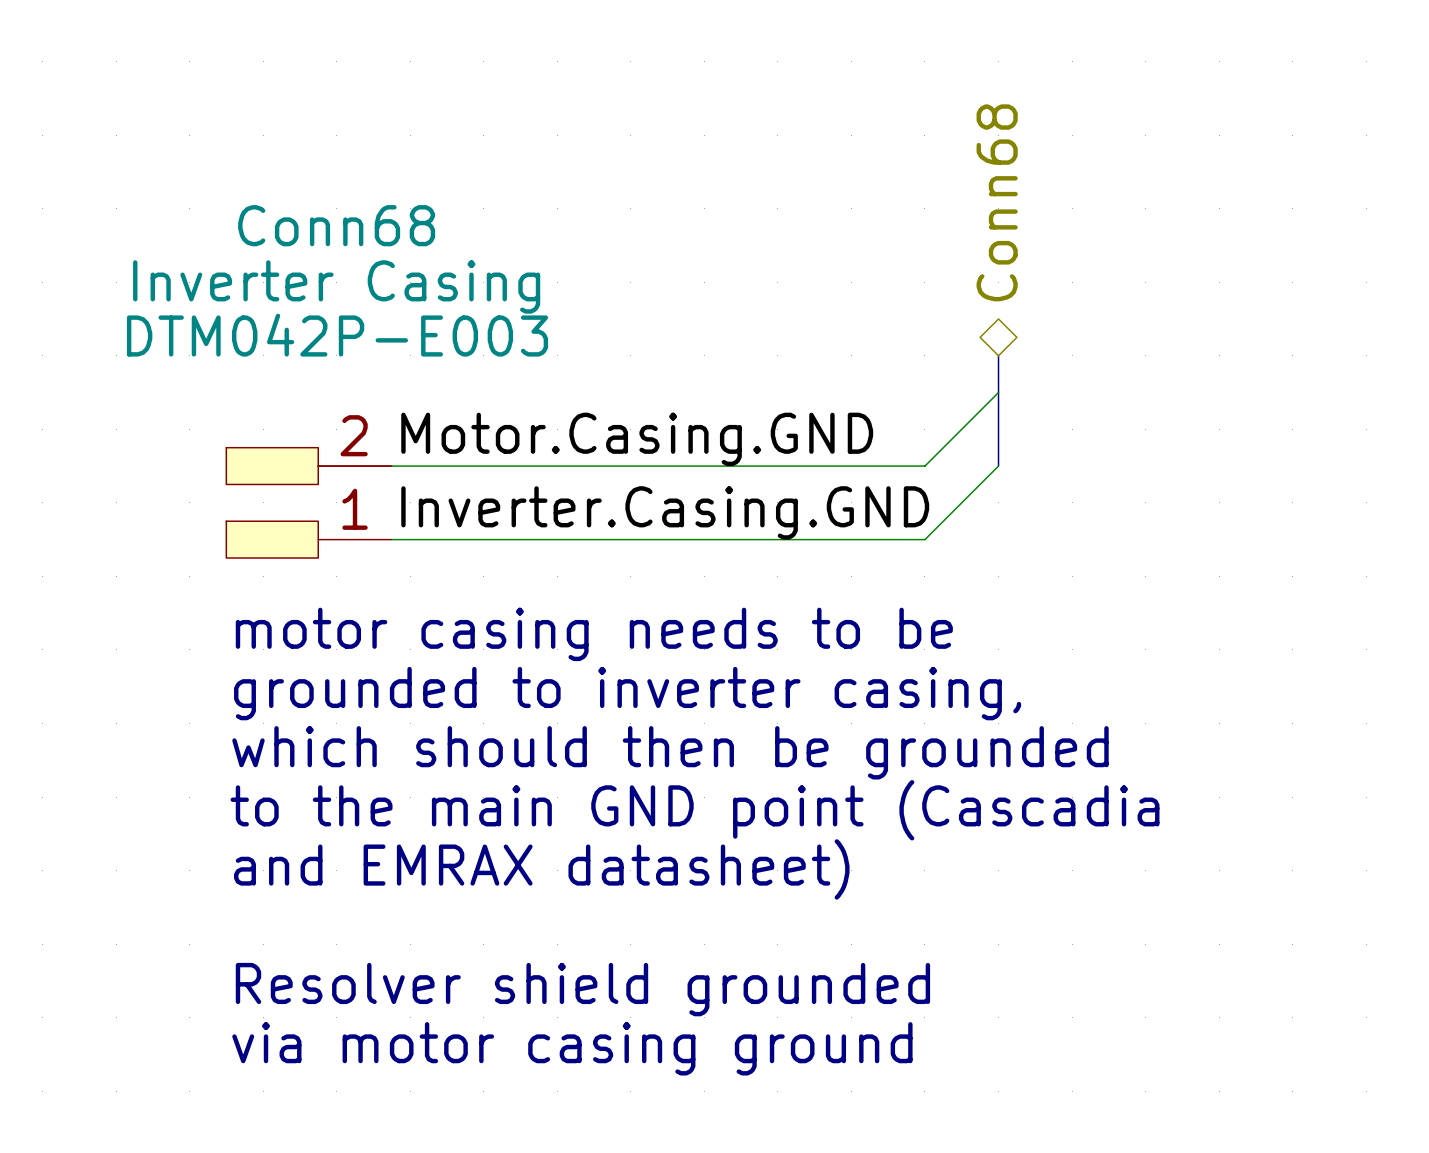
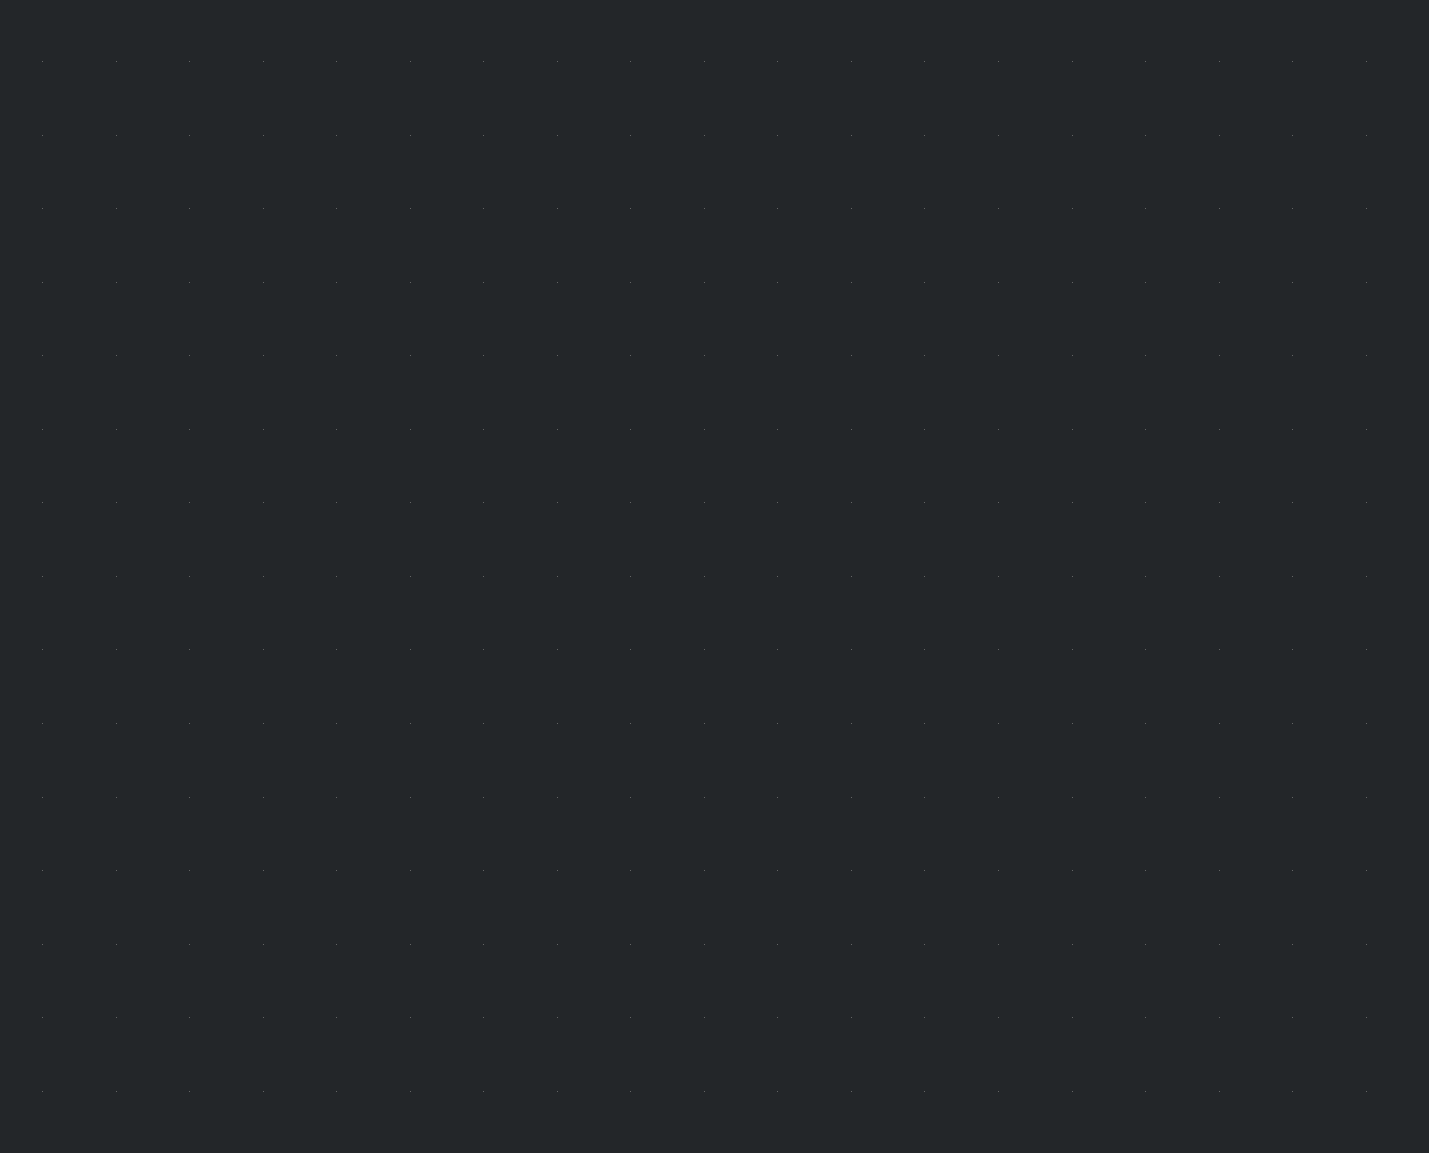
hierarchical label: Conn68 (997, 202) -> none
bus: (998, 355) (998, 466) -> none
wire: (998, 392) (924, 466) (391, 466) -> none
label: Motor.Casing.GND (637, 439) -> none
wire: (998, 466) (924, 539) (391, 539) -> none
Conn68: Inverter Casing (309, 502) -> none
label: Inverter.Casing.GND (665, 512) -> none
text: motor casing needs to be (594, 634) -> none
text: grounded to inverter casing, (627, 693) -> none
text: which should then be grounded (670, 752) -> none
text: to the main GND point (Cascadia (694, 810) -> none
text: and EMRAX datasheet) (541, 869) -> none
text: Resolver shield grounded (582, 989) -> none
text: via motor casing ground (572, 1048) -> none

